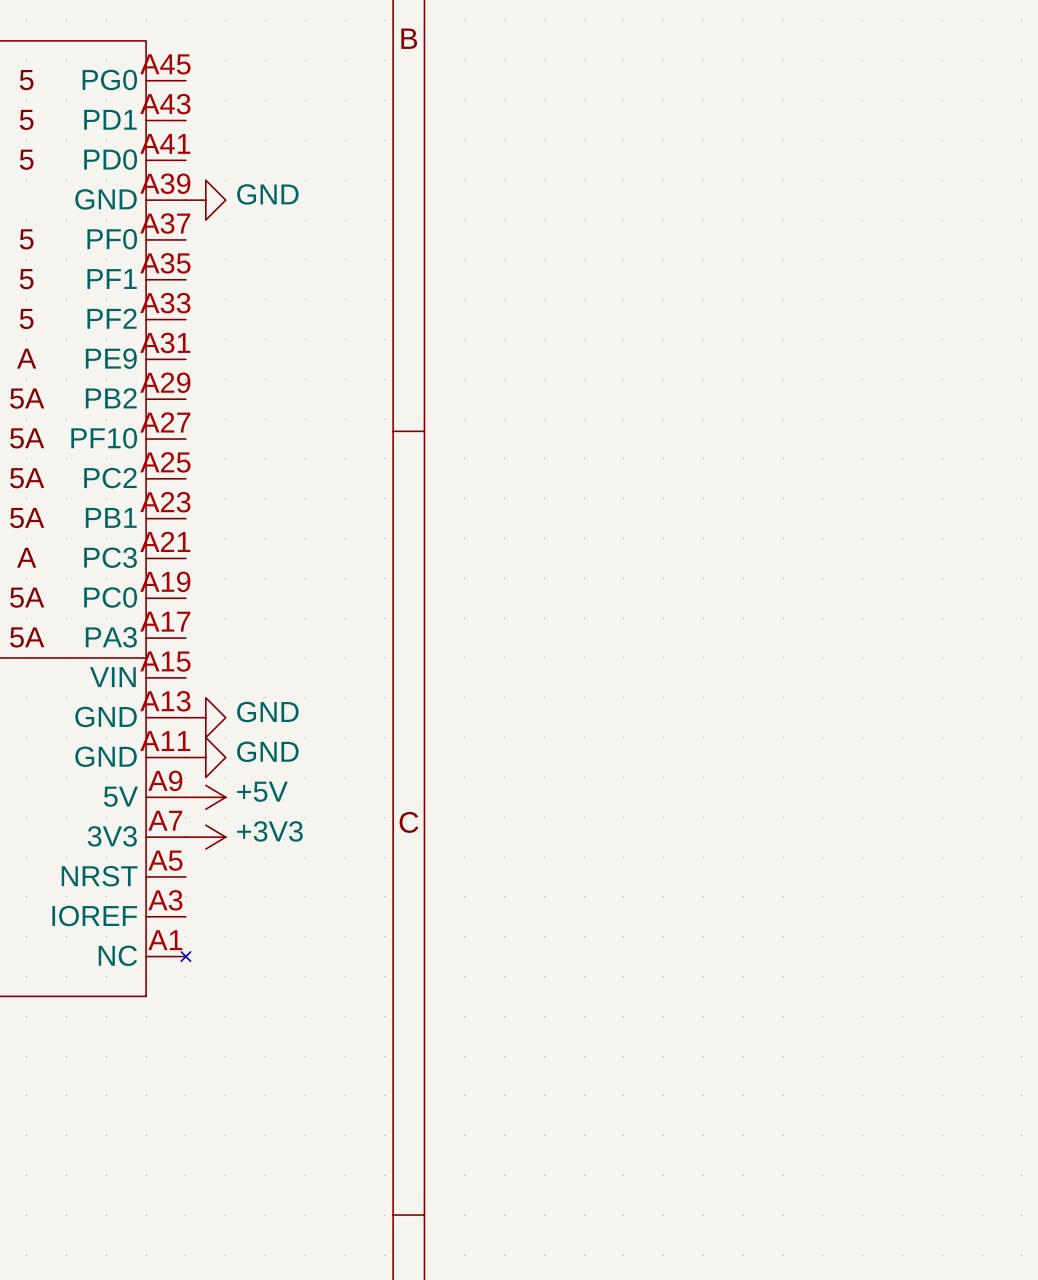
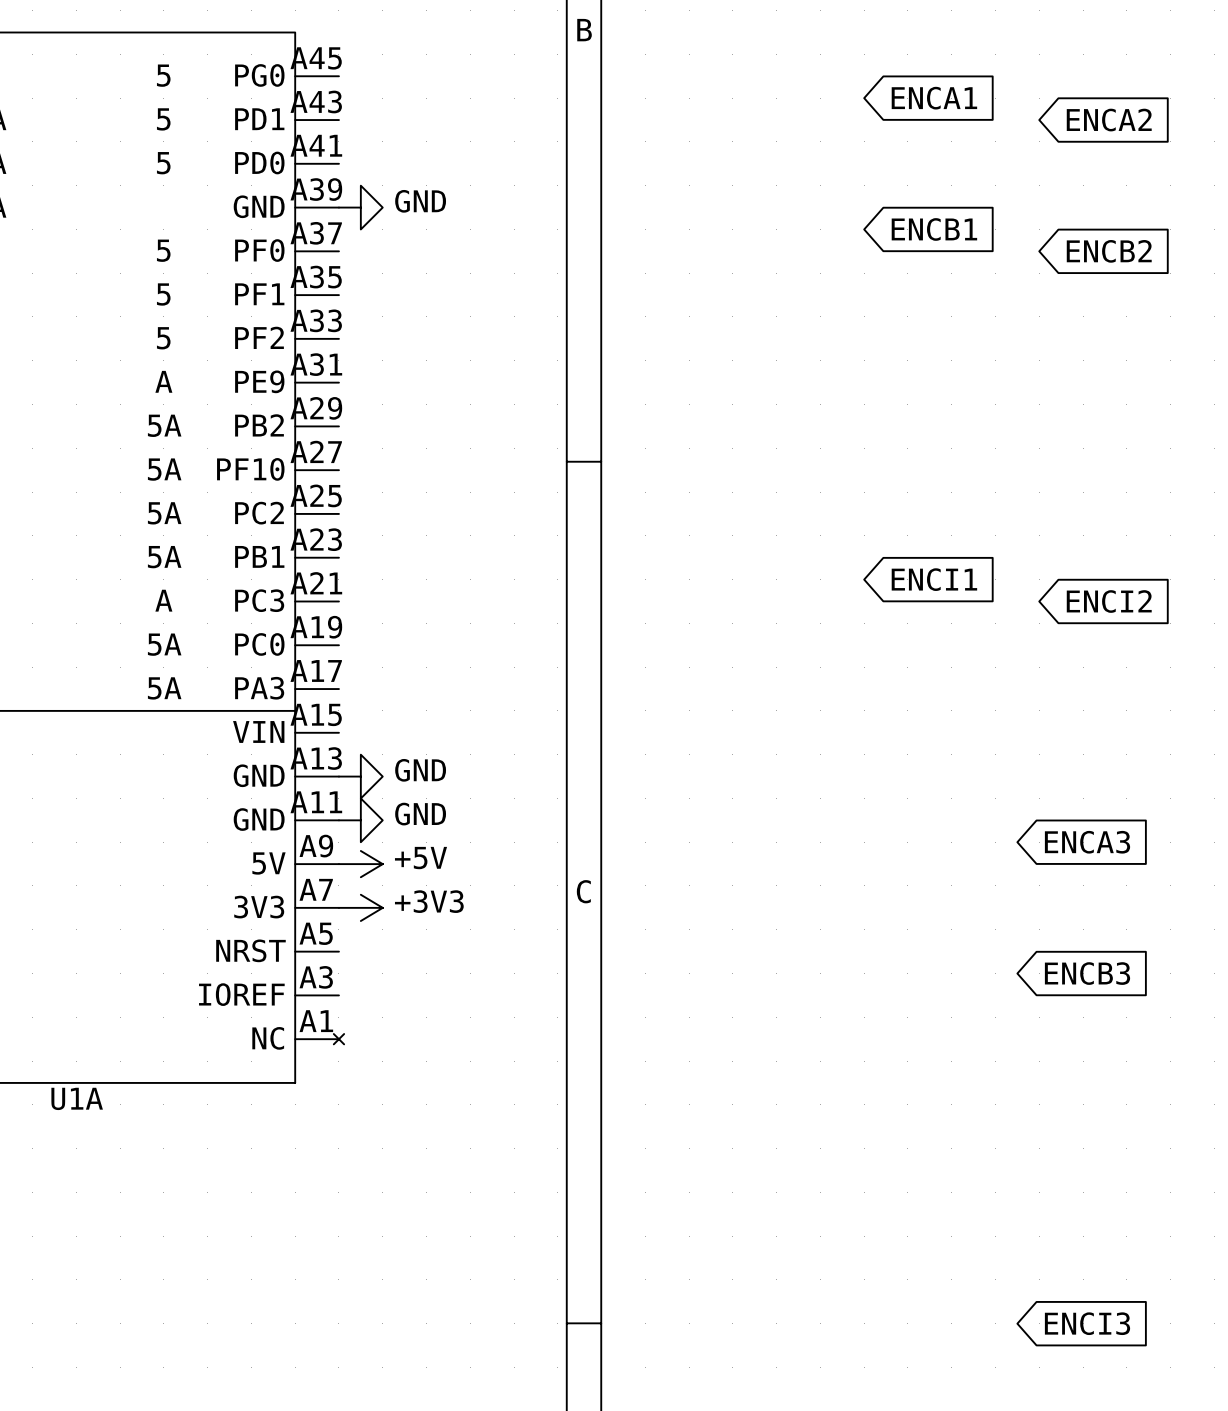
global label: none -> ENCA1 (934, 98)
global label: none -> ENCA2 (1109, 120)
global label: none -> ENCB1 (934, 229)
global label: none -> ENCB2 (1109, 251)
global label: none -> ENCI1 (934, 579)
global label: none -> ENCI2 (1109, 601)
global label: none -> ENCA3 (1087, 842)
global label: none -> ENCB3 (1087, 973)
global label: none -> ENCI3 (1087, 1323)

